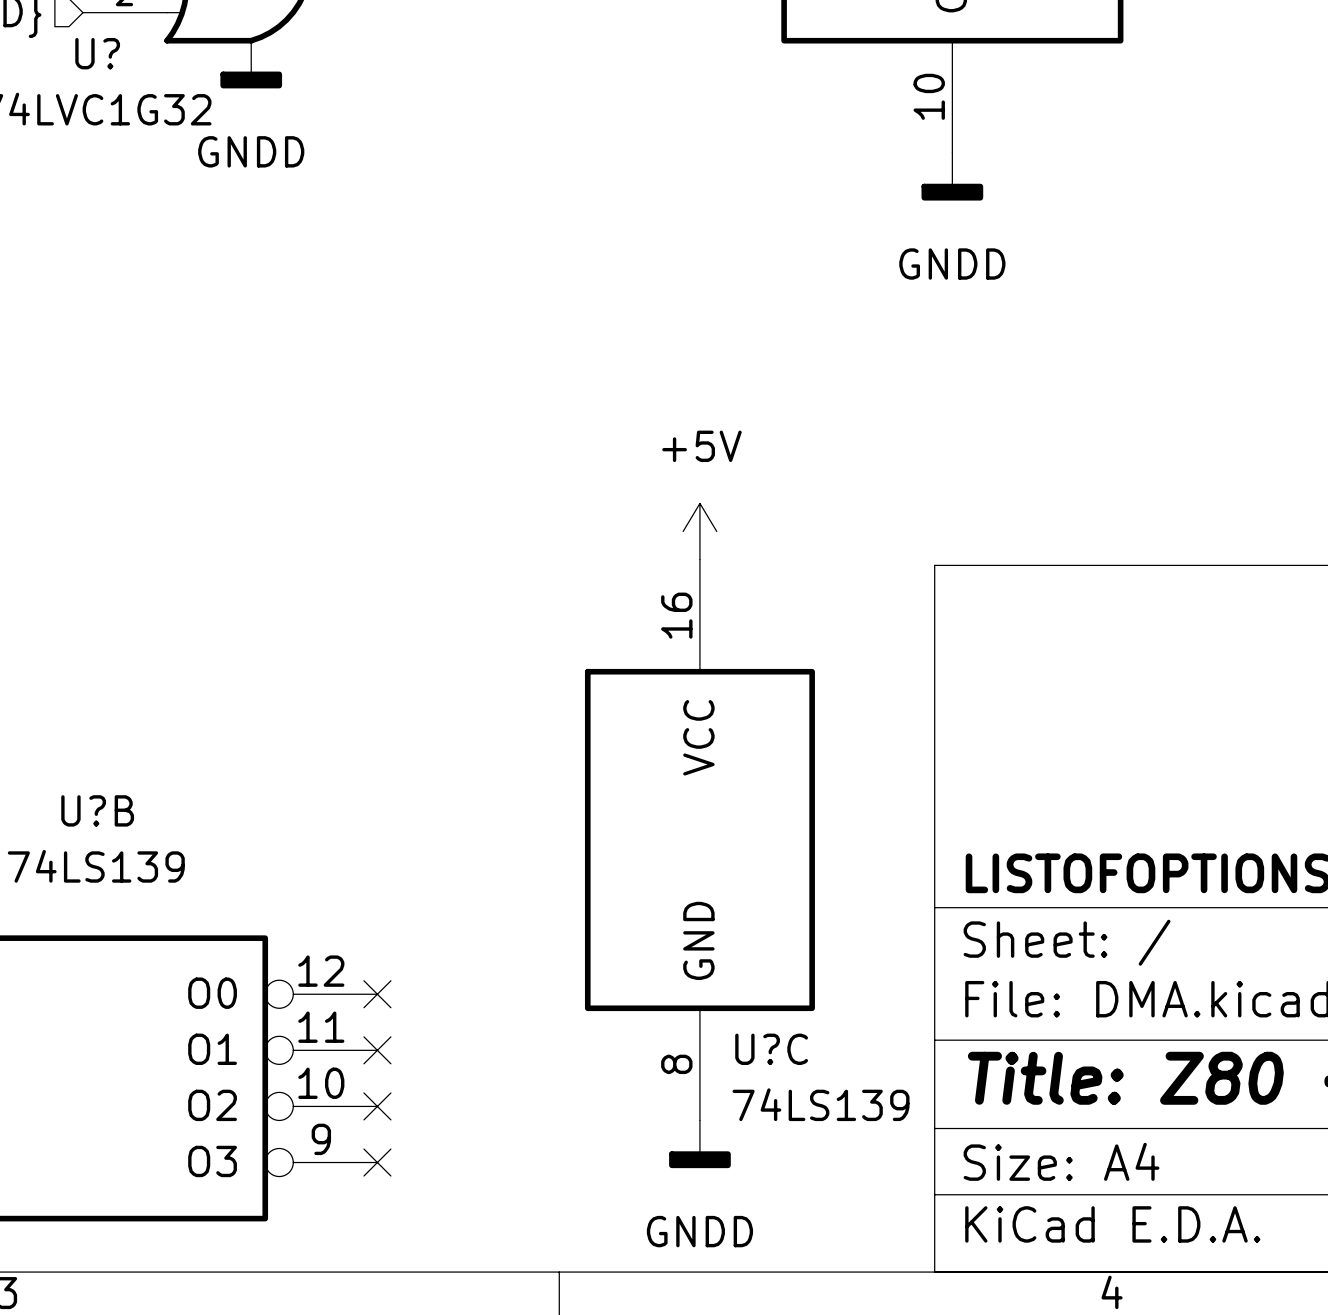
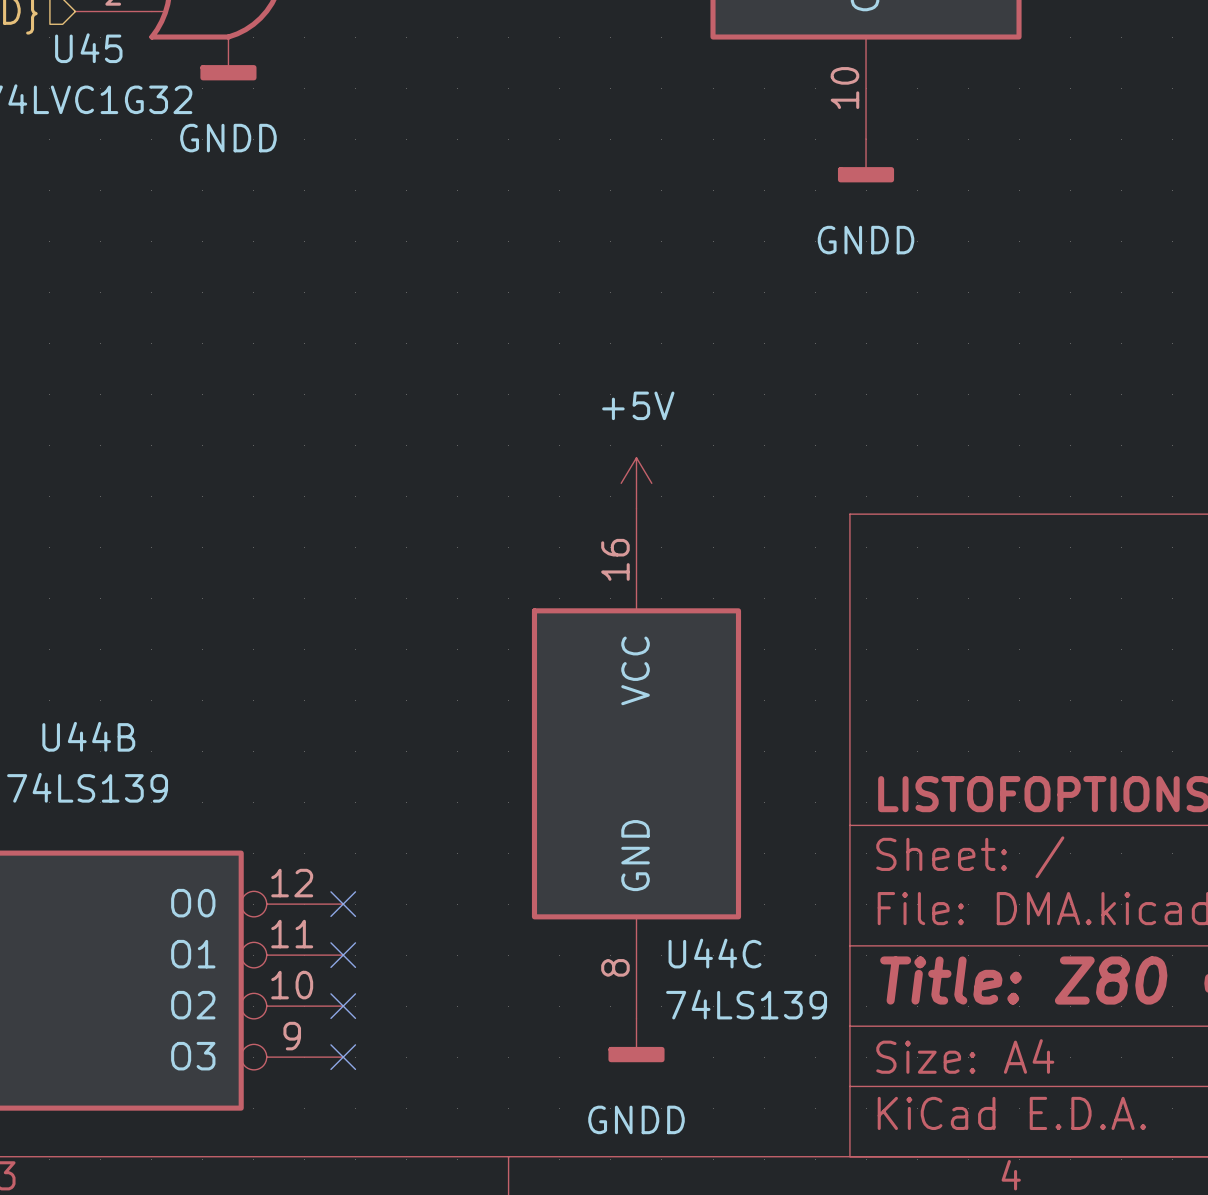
U? name: U? (97, 53) -> U45 (88, 48)
U?B name: U?B (97, 810) -> U44B (88, 736)
U?C name: U?C (771, 1049) -> U44C (715, 953)

